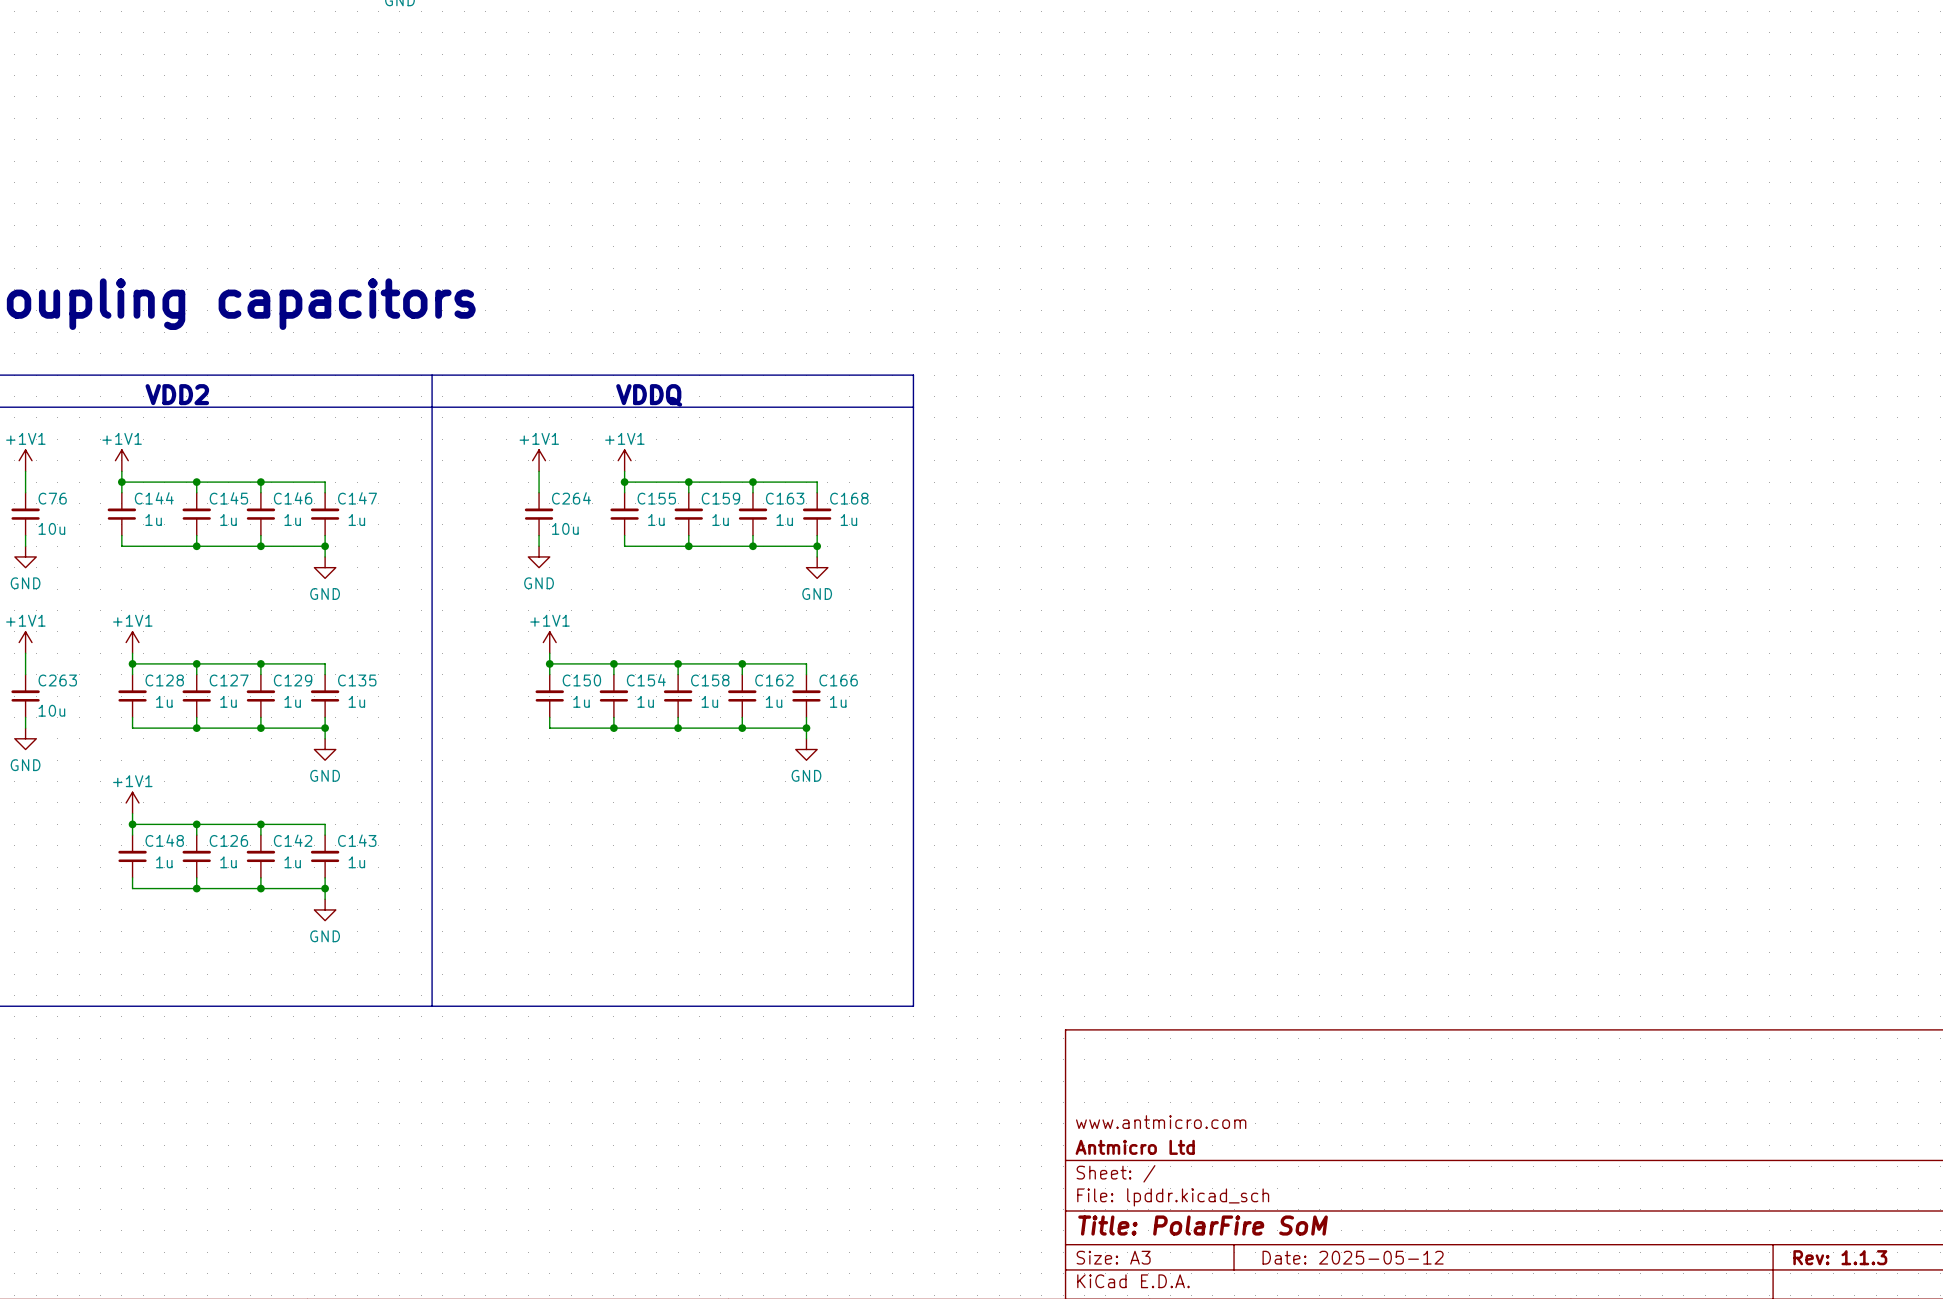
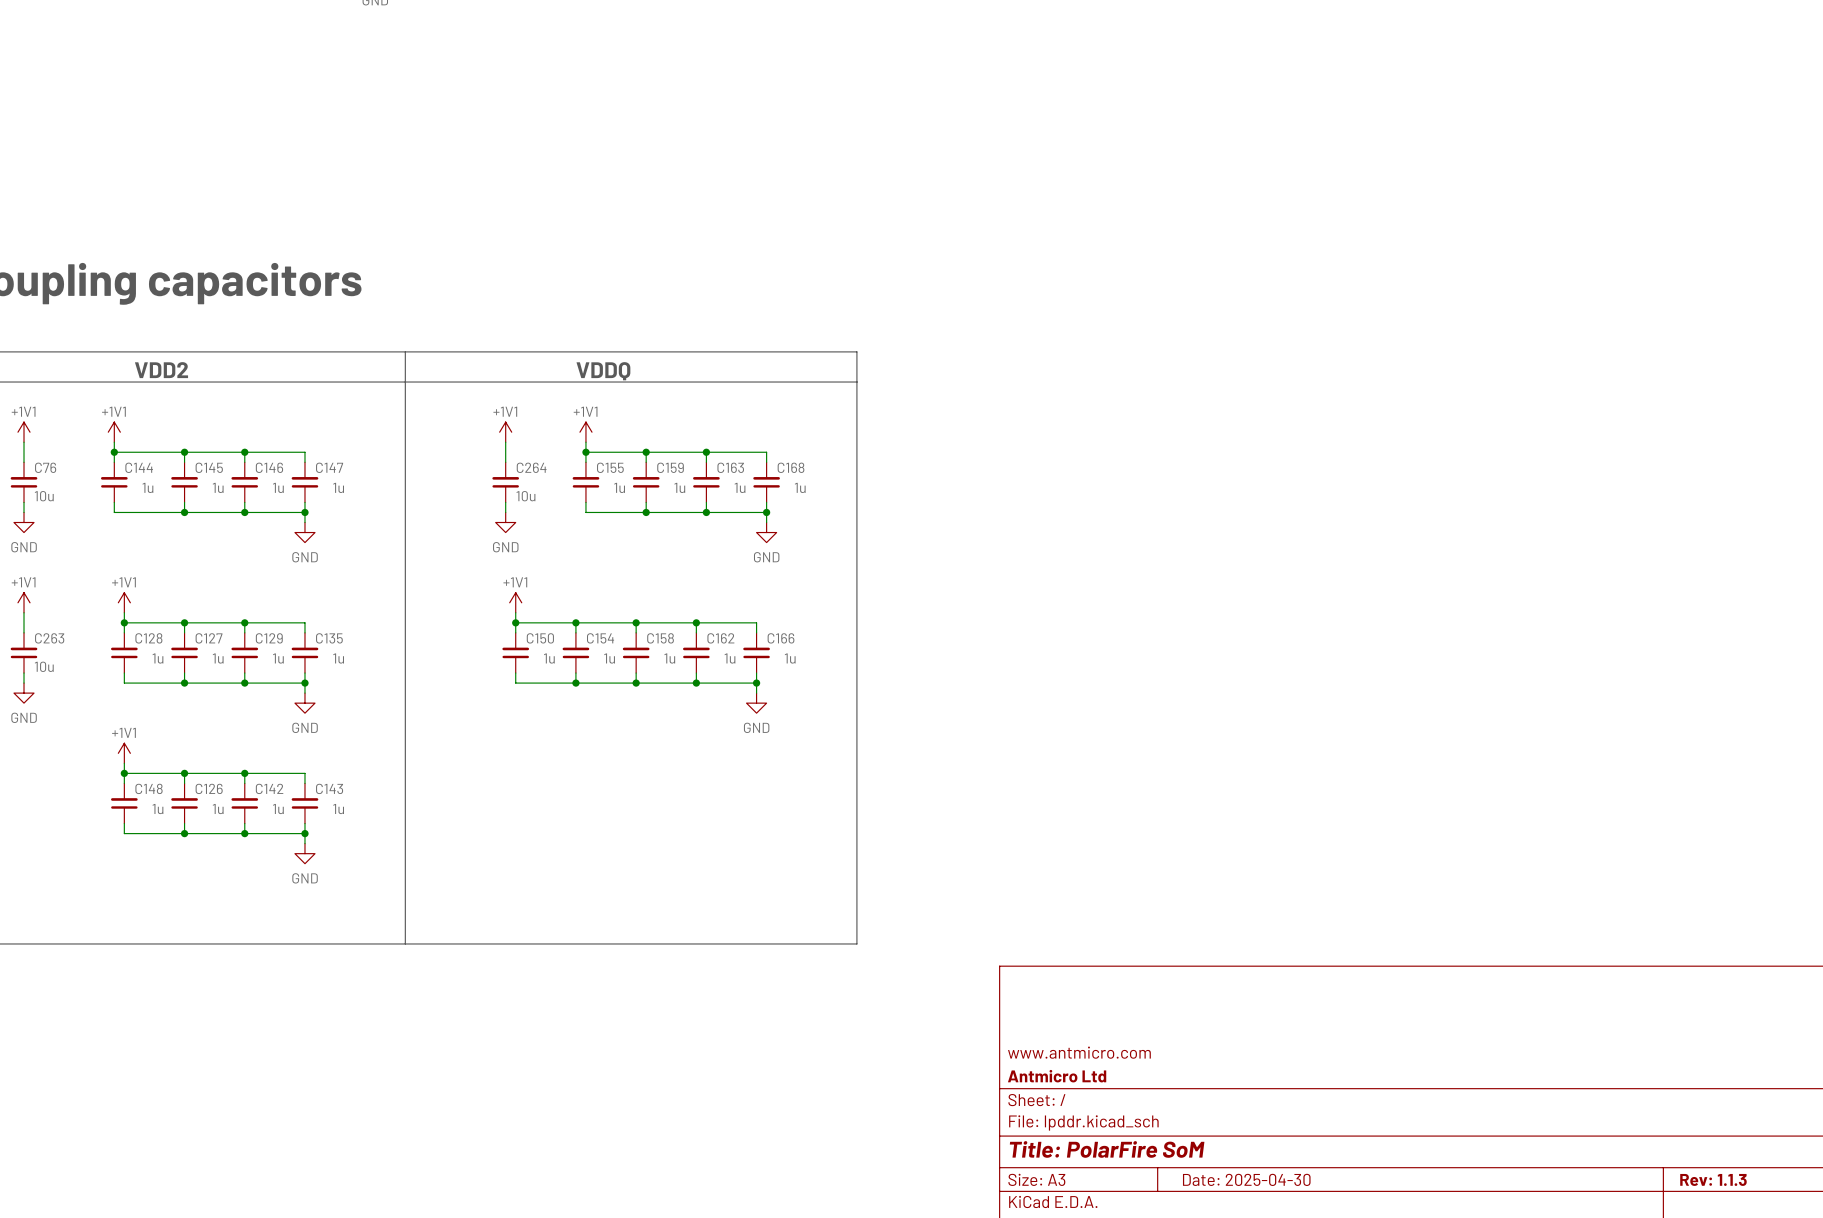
title block: Date: 2025-05-12 (1353, 1257) -> Date: 2025-04-30 (1246, 1179)

